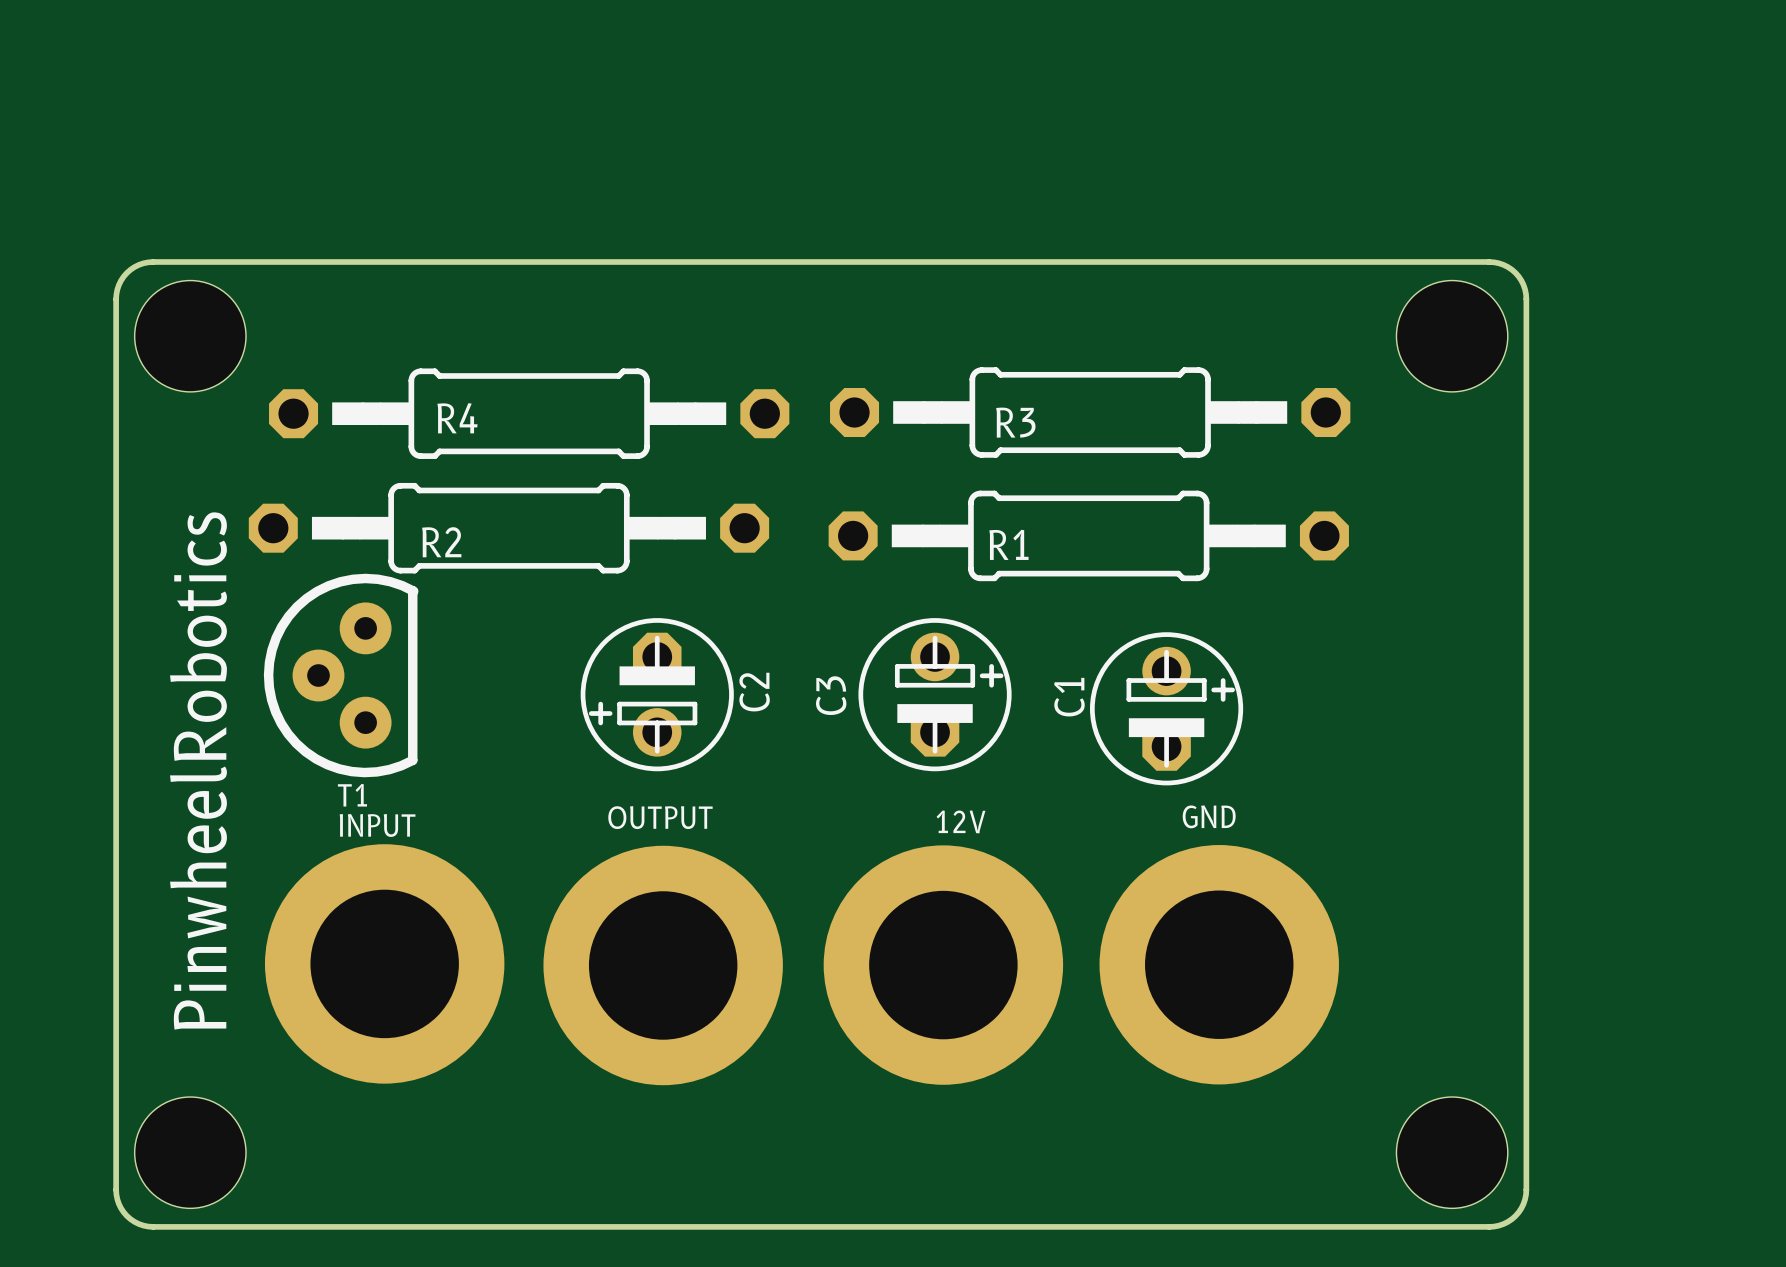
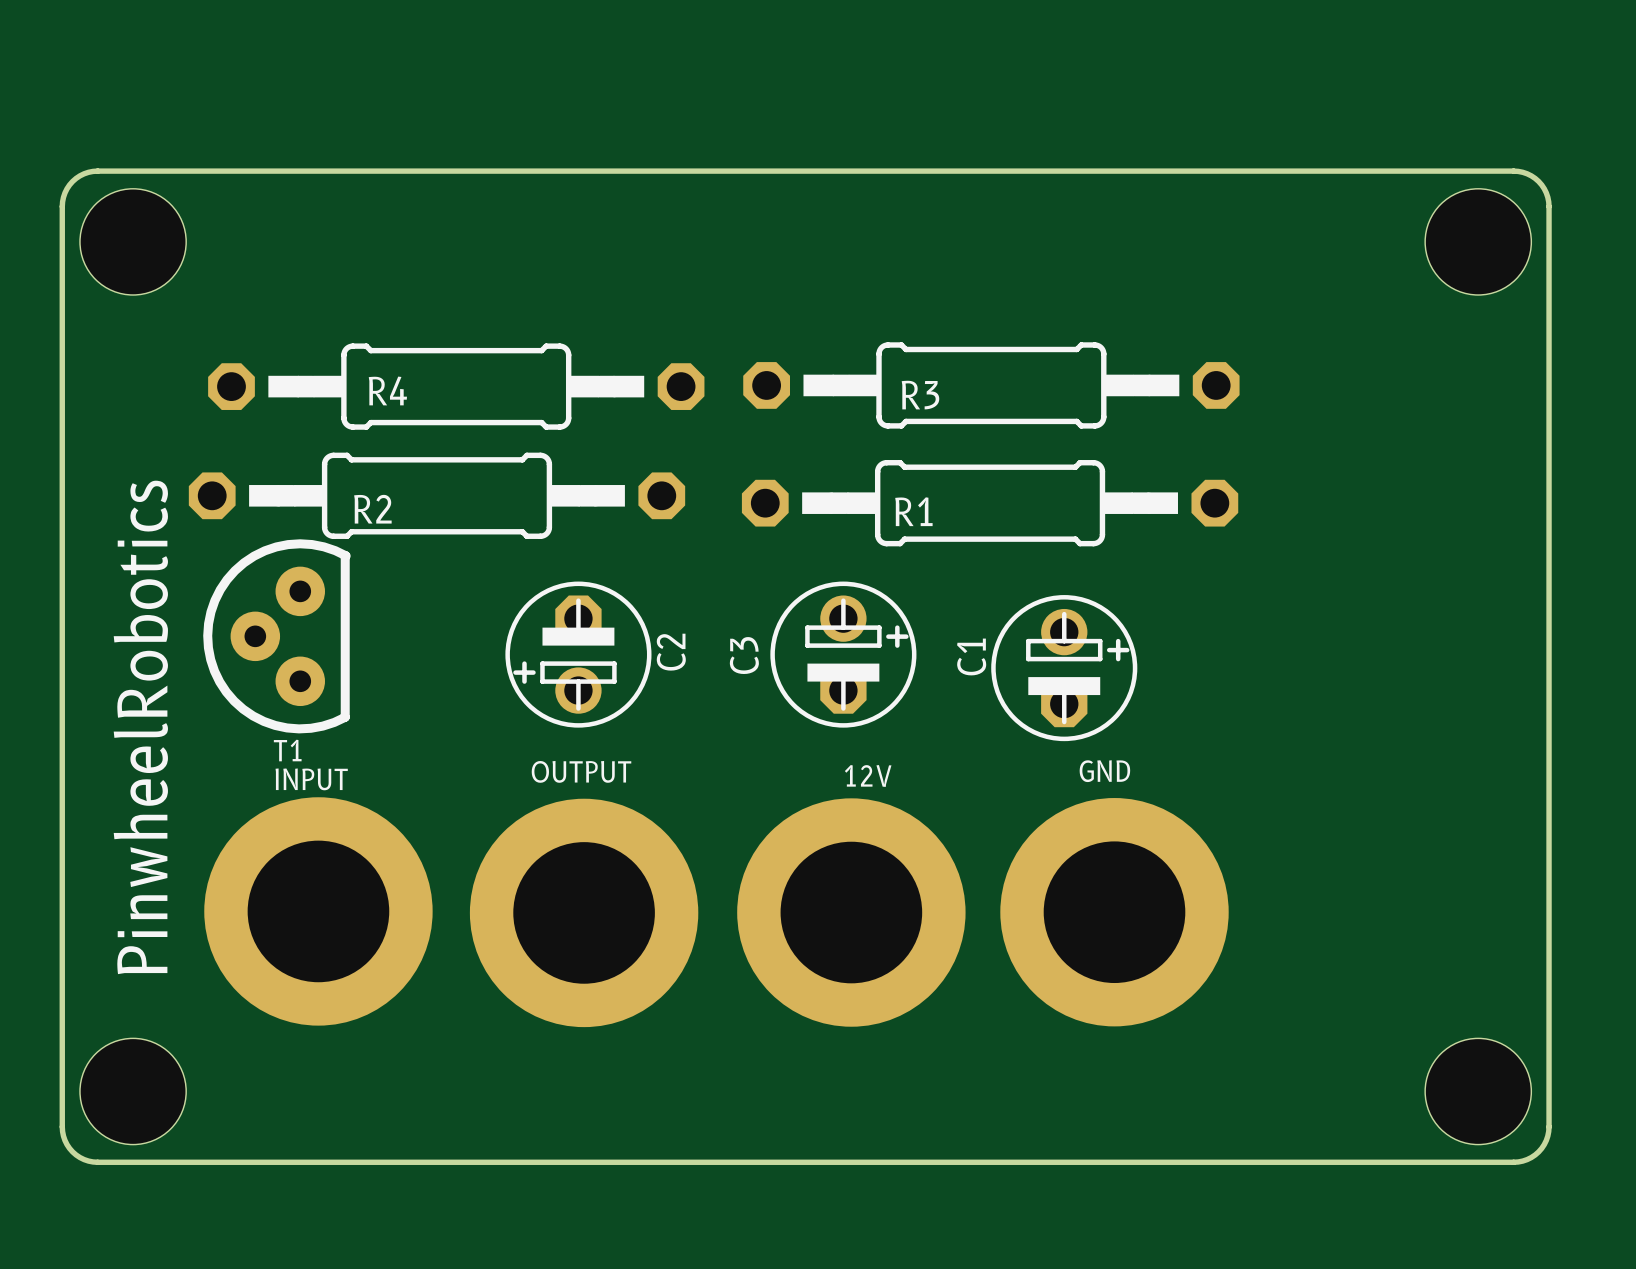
board edge: (116, 299) (118, 284) (126, 272) (139, 264) (153, 262) (1489, 262) (1503, 264) (1511, 269) (1523, 284) (1526, 299) (1526, 1189) (1523, 1203) (1515, 1216) (1503, 1224) (1489, 1226) -> (62, 277) (63, 197) (69, 184) (76, 178) (93, 171) (1513, 171) (1527, 173) (1535, 178) (1546, 192) (1549, 206) (1548, 1131) (1546, 1140) (1538, 1151) (1527, 1159) (1518, 1161) (1372, 1162)
hole position: (190, 336) -> (133, 241)
hole position: (1452, 336) -> (1478, 241)
hole position: (1452, 1152) -> (1478, 1091)

